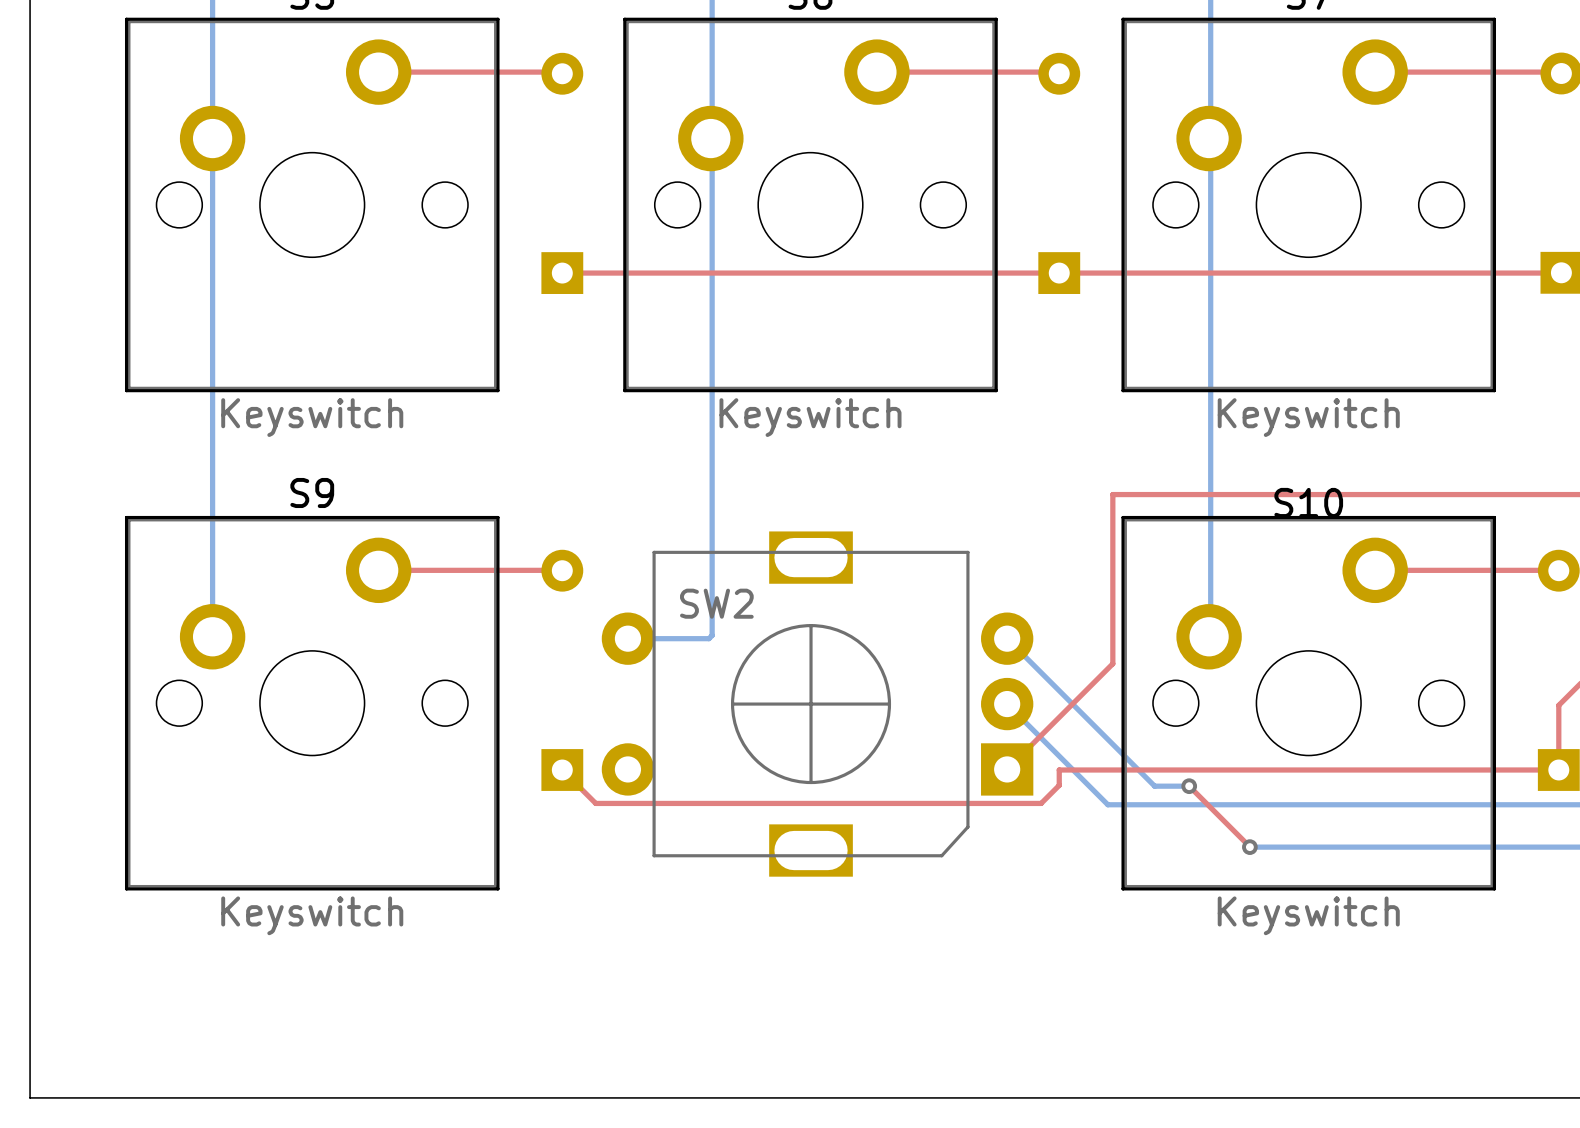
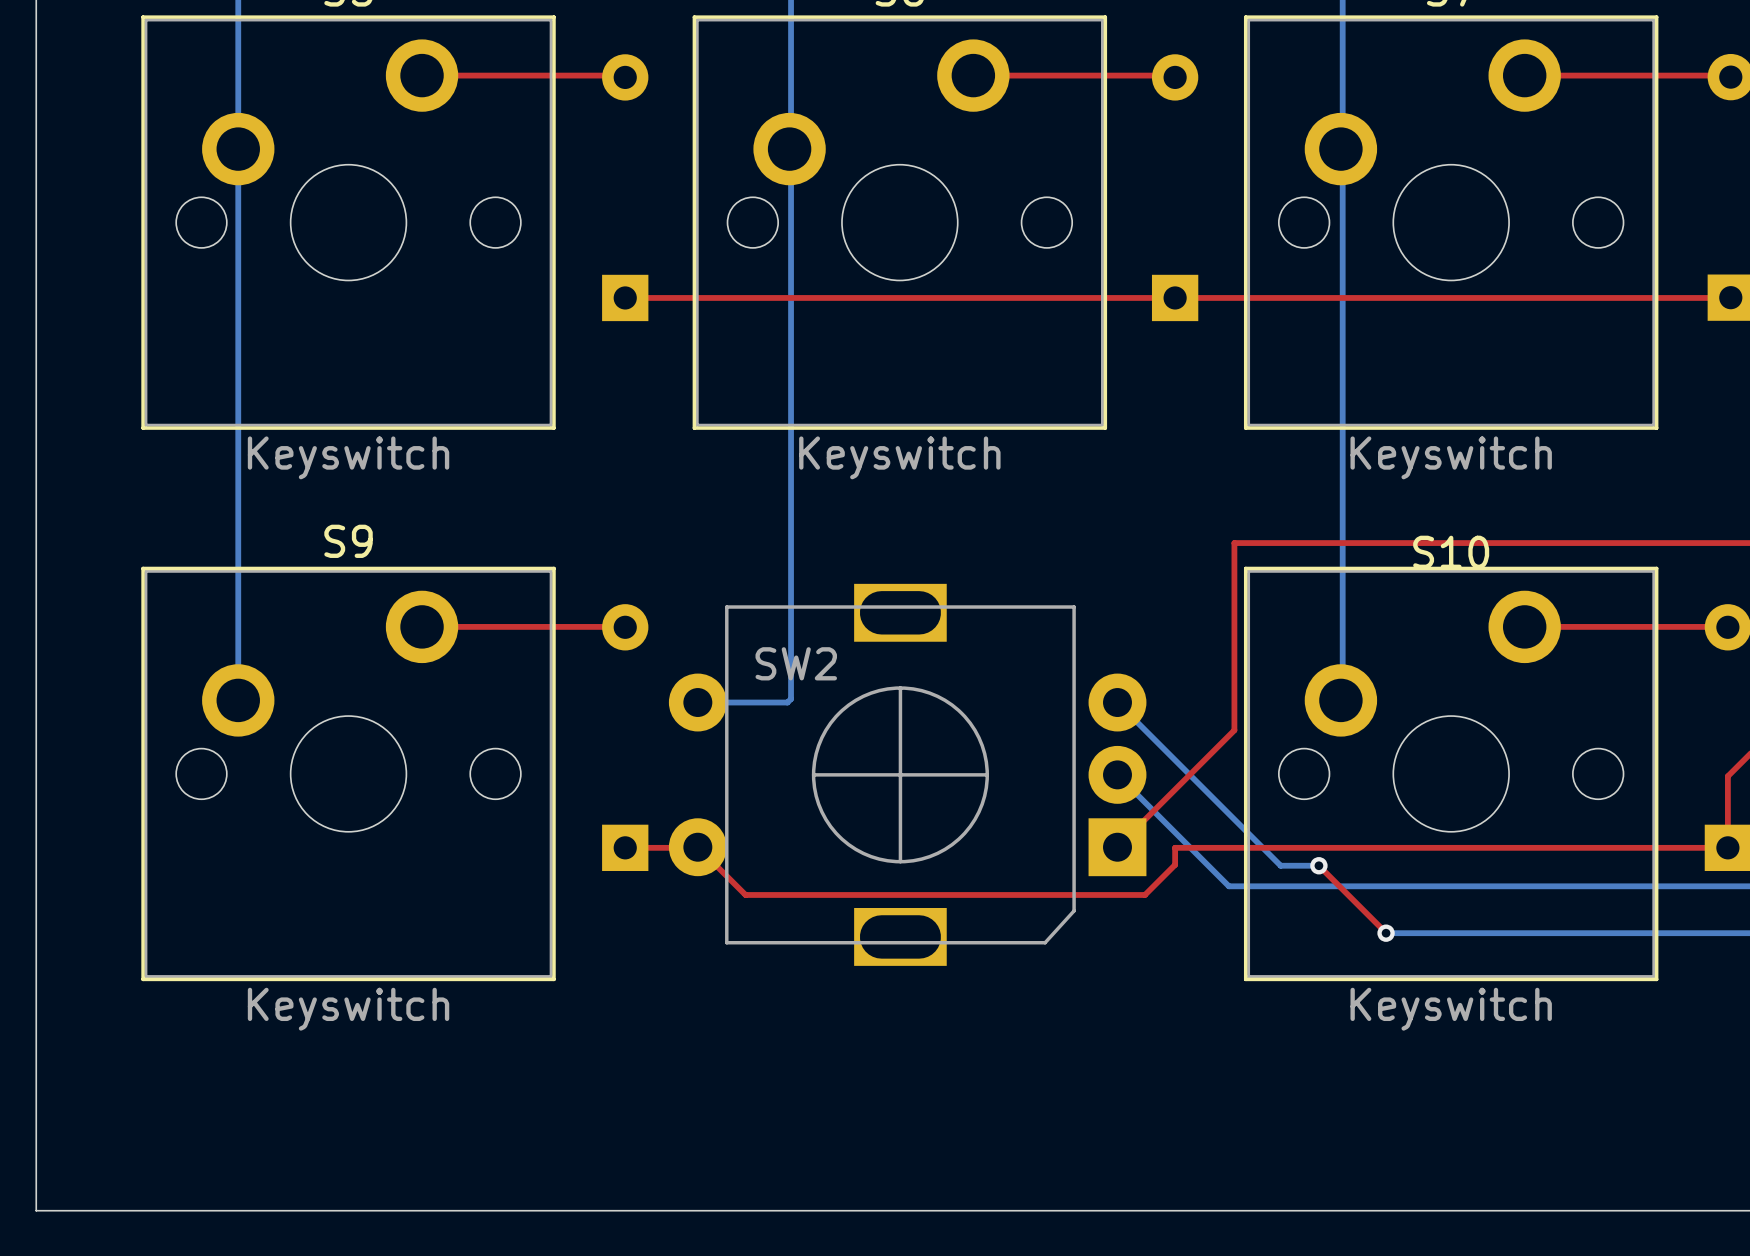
top track: (562, 770) (595, 803) (1041, 803) -> (625, 847) (697, 847) (745, 894) (1144, 894) (1155, 884)

